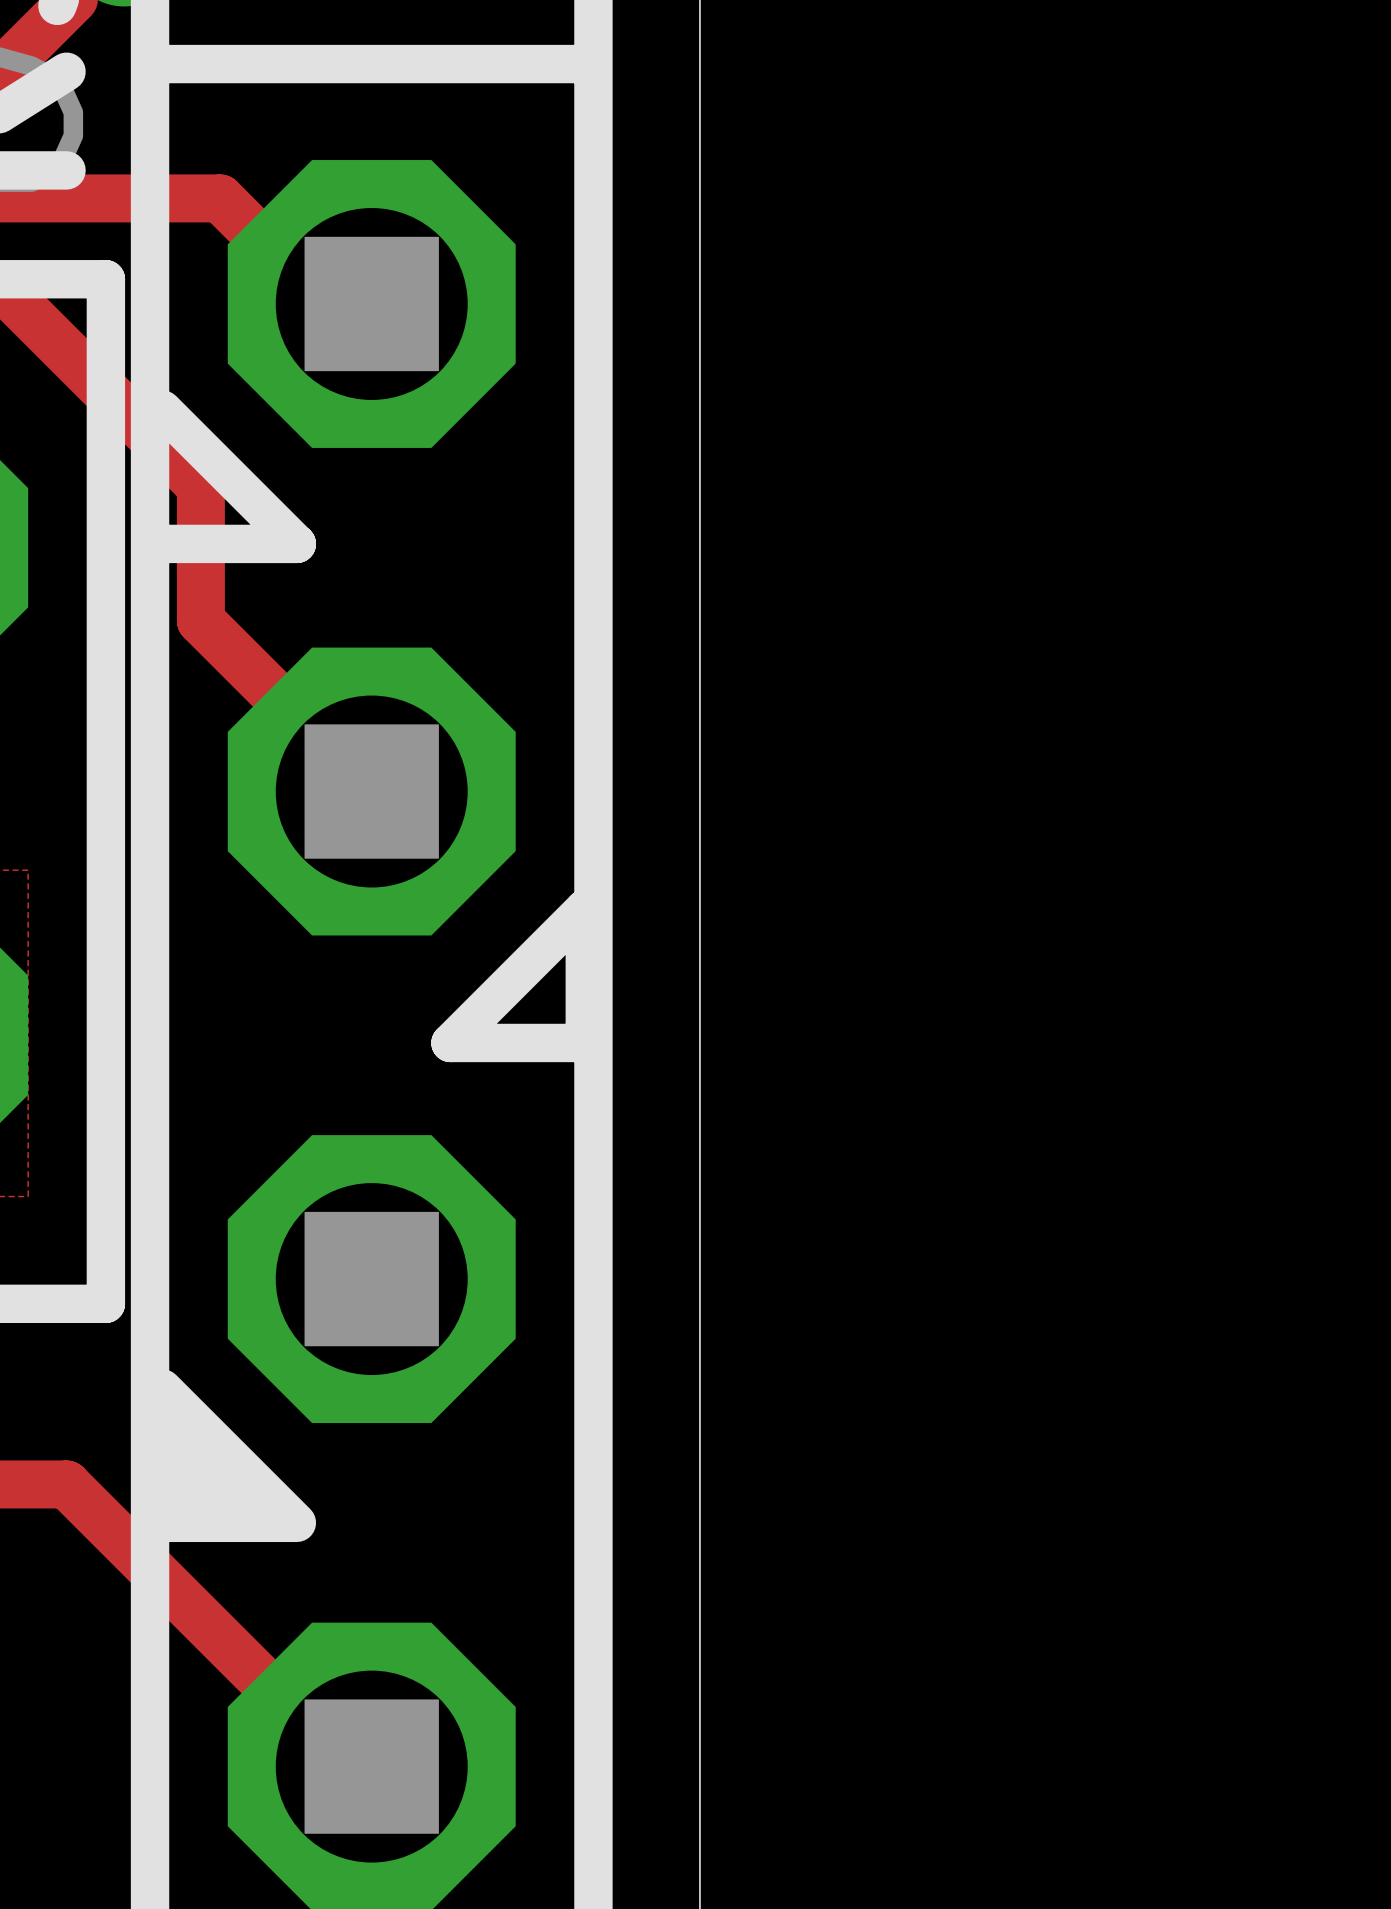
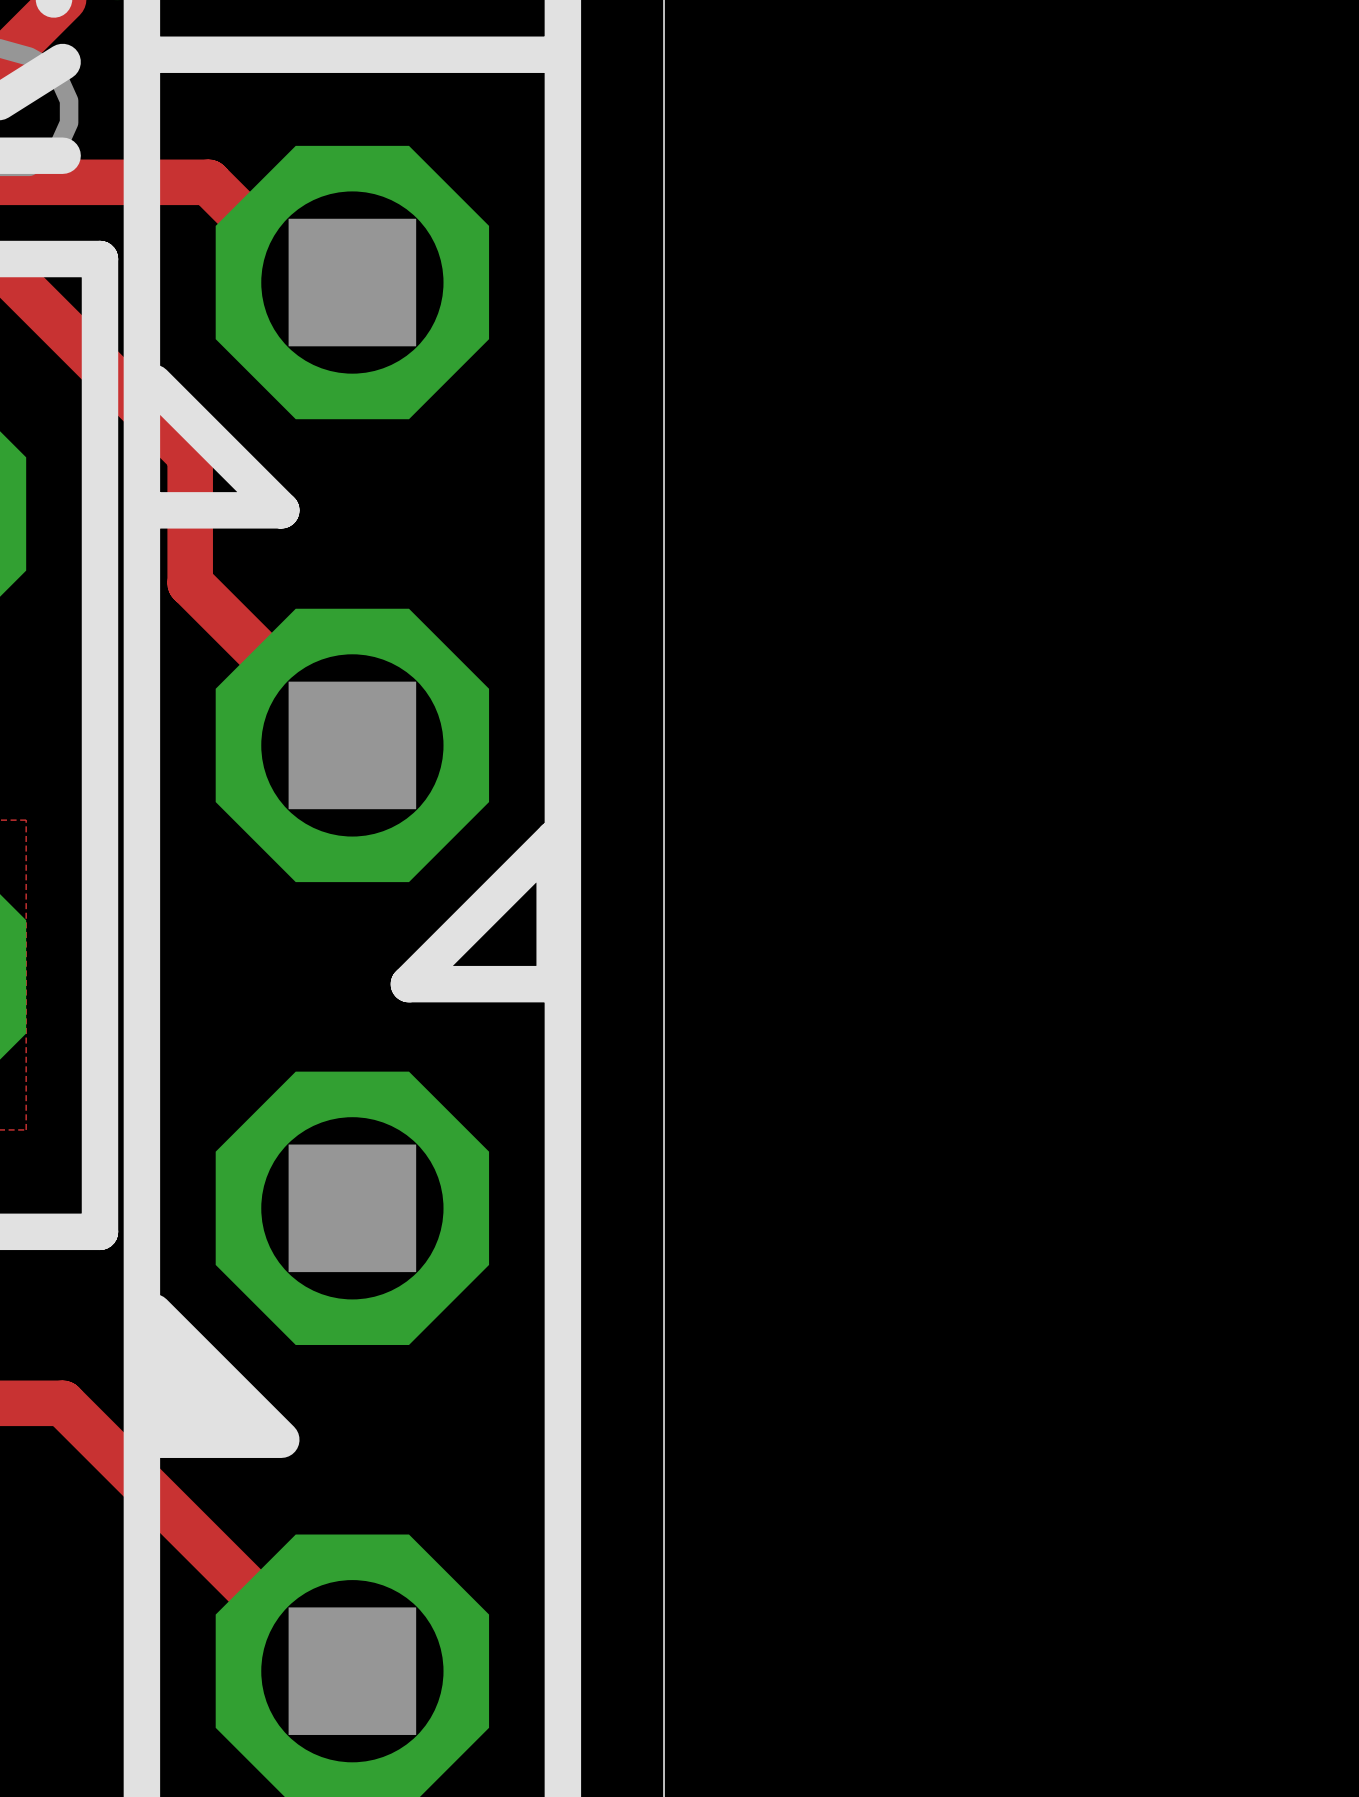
line: (584, 908) (450, 1042) -> (554, 856) (554, 838) (408, 984) (427, 984)

